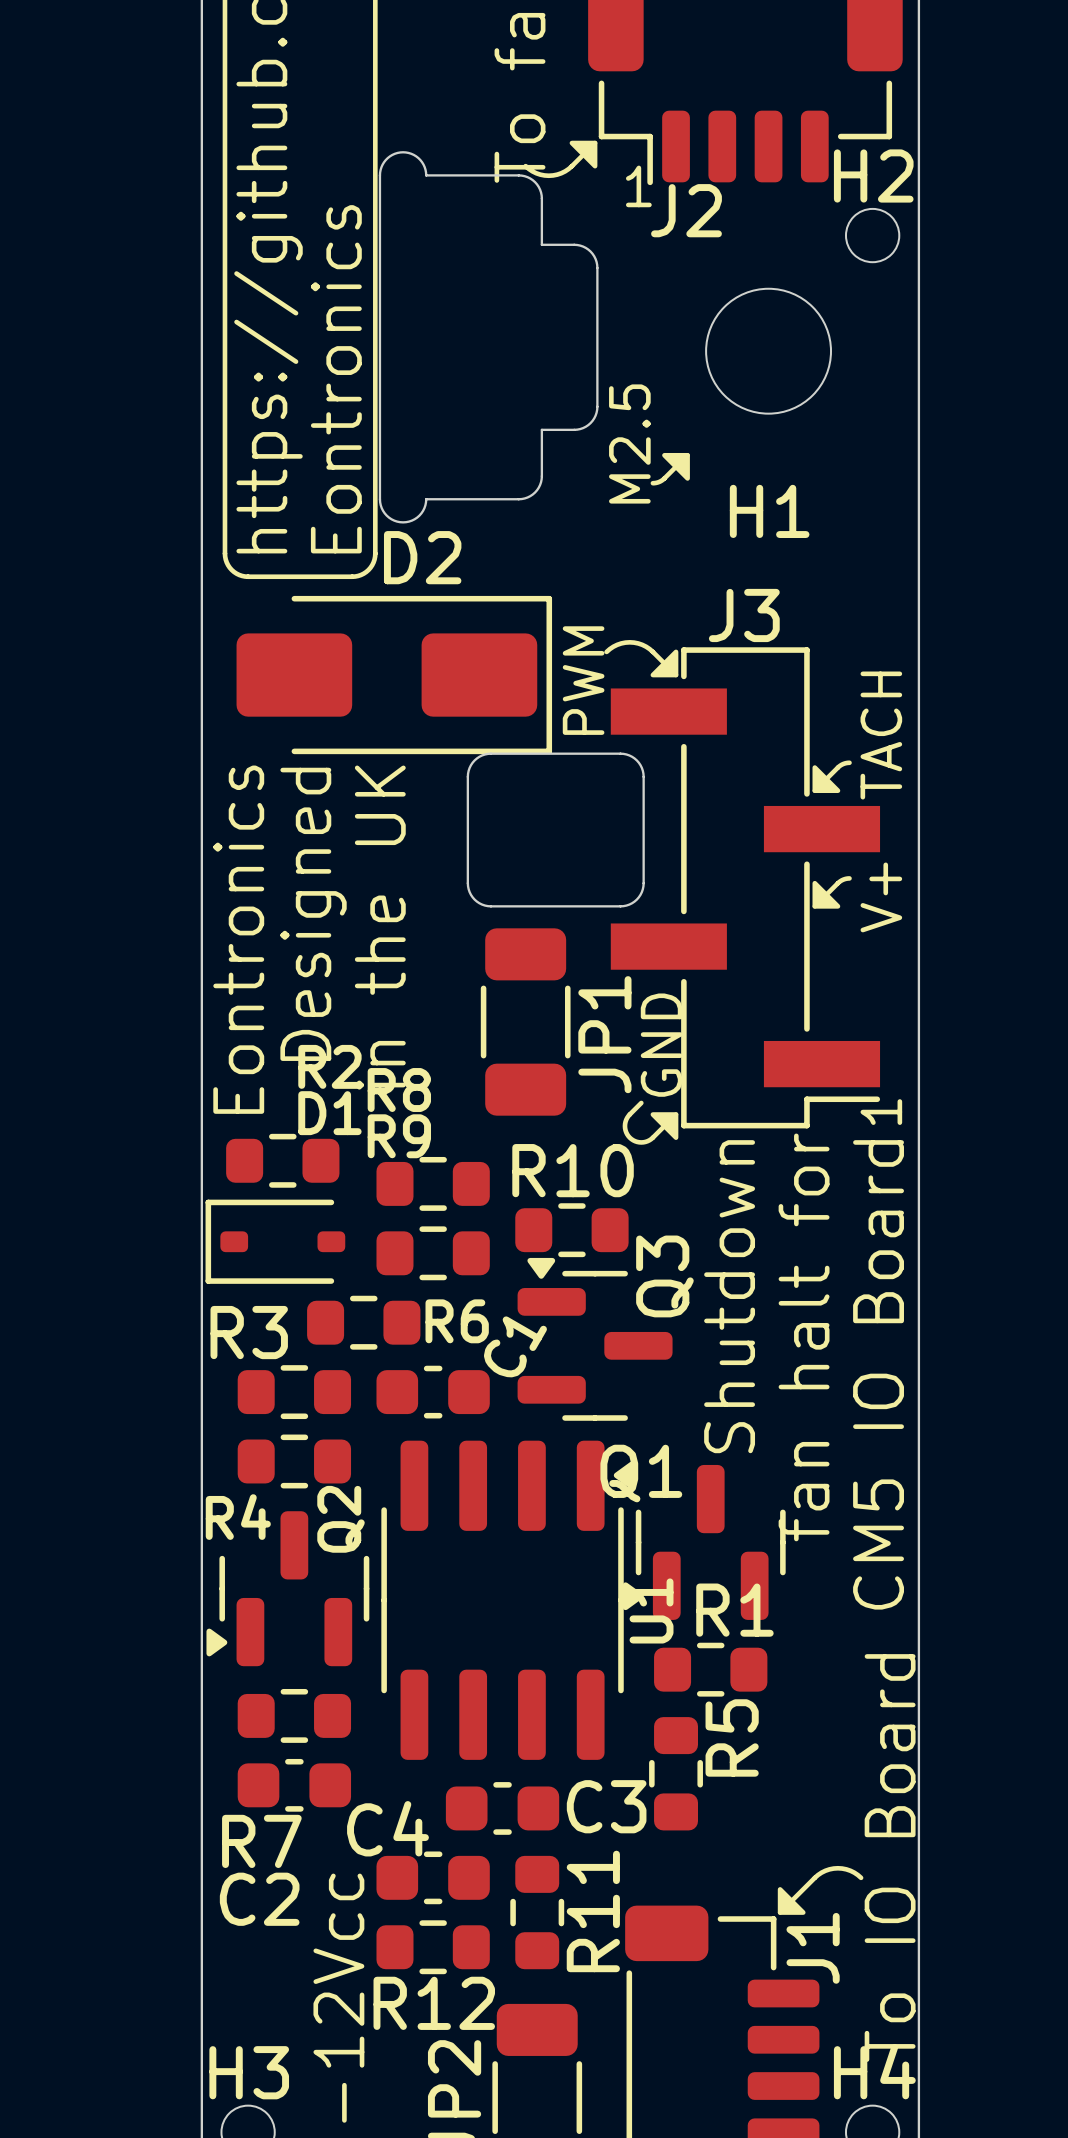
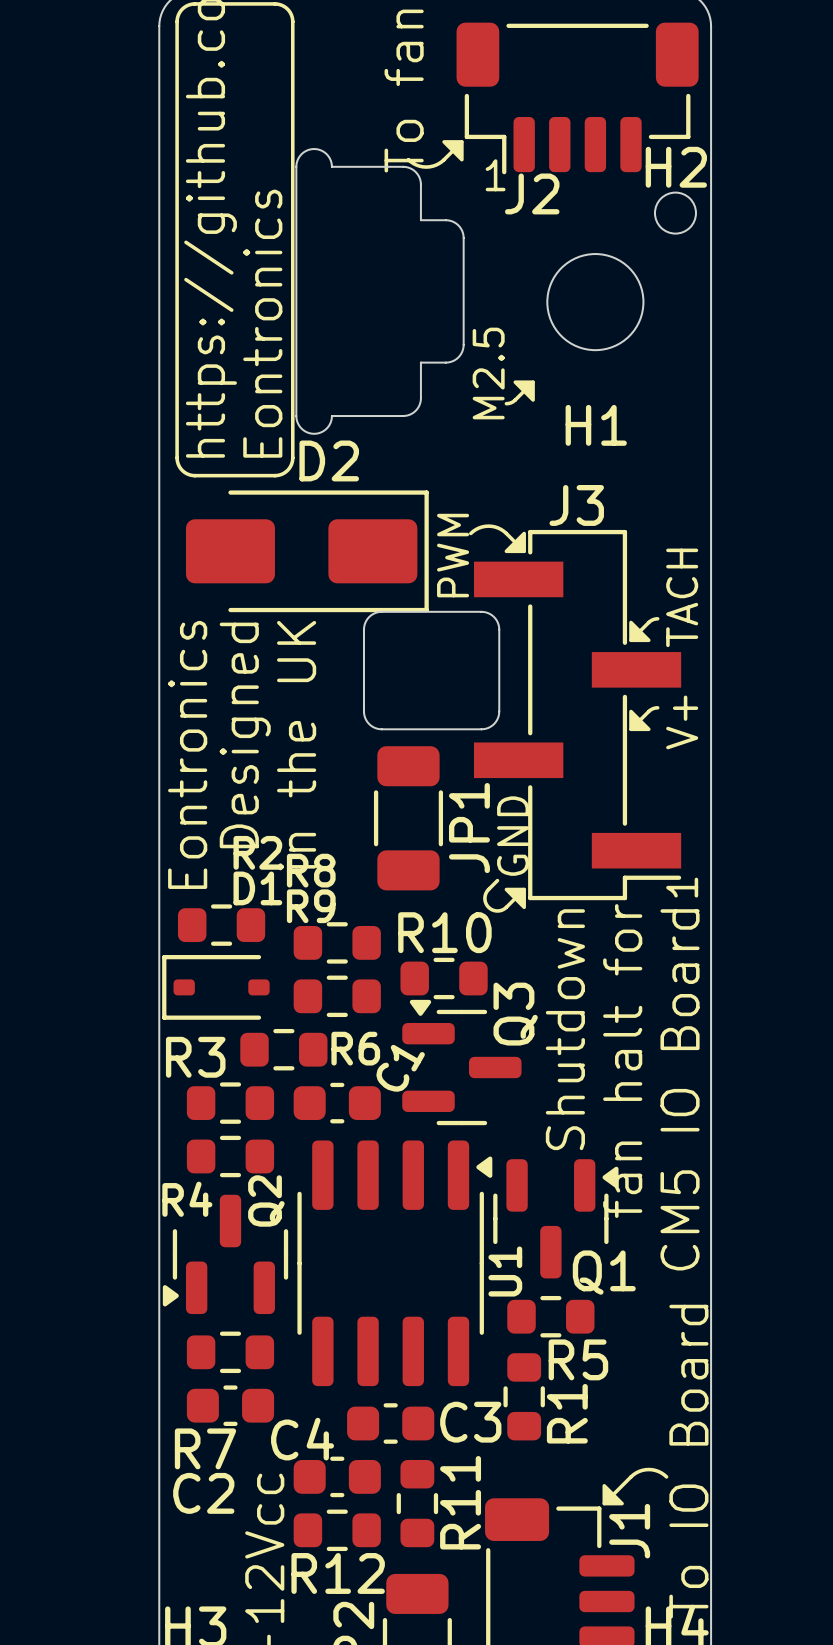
Q1 rotation: 0° (704, 1542) -> 180° (555, 1218)
R1 name: R1 (734, 1610) -> R5 (578, 1359)
R5 name: R5 (732, 1737) -> R1 (567, 1413)

